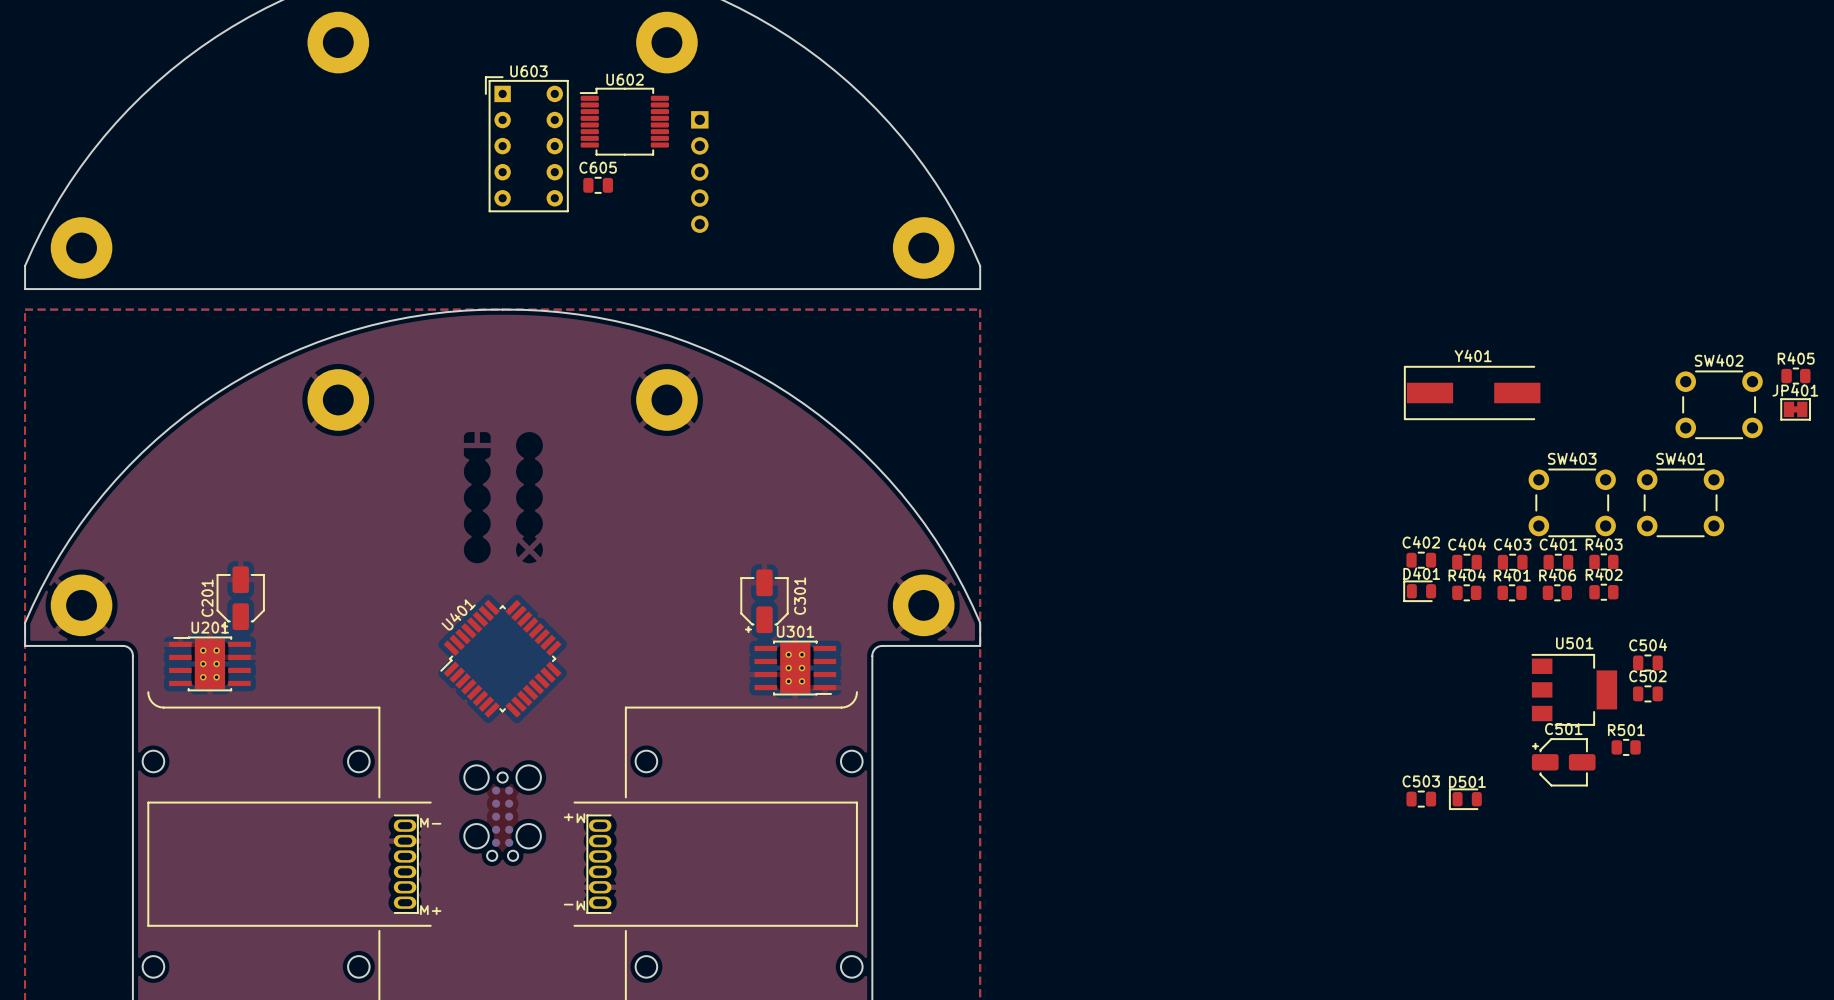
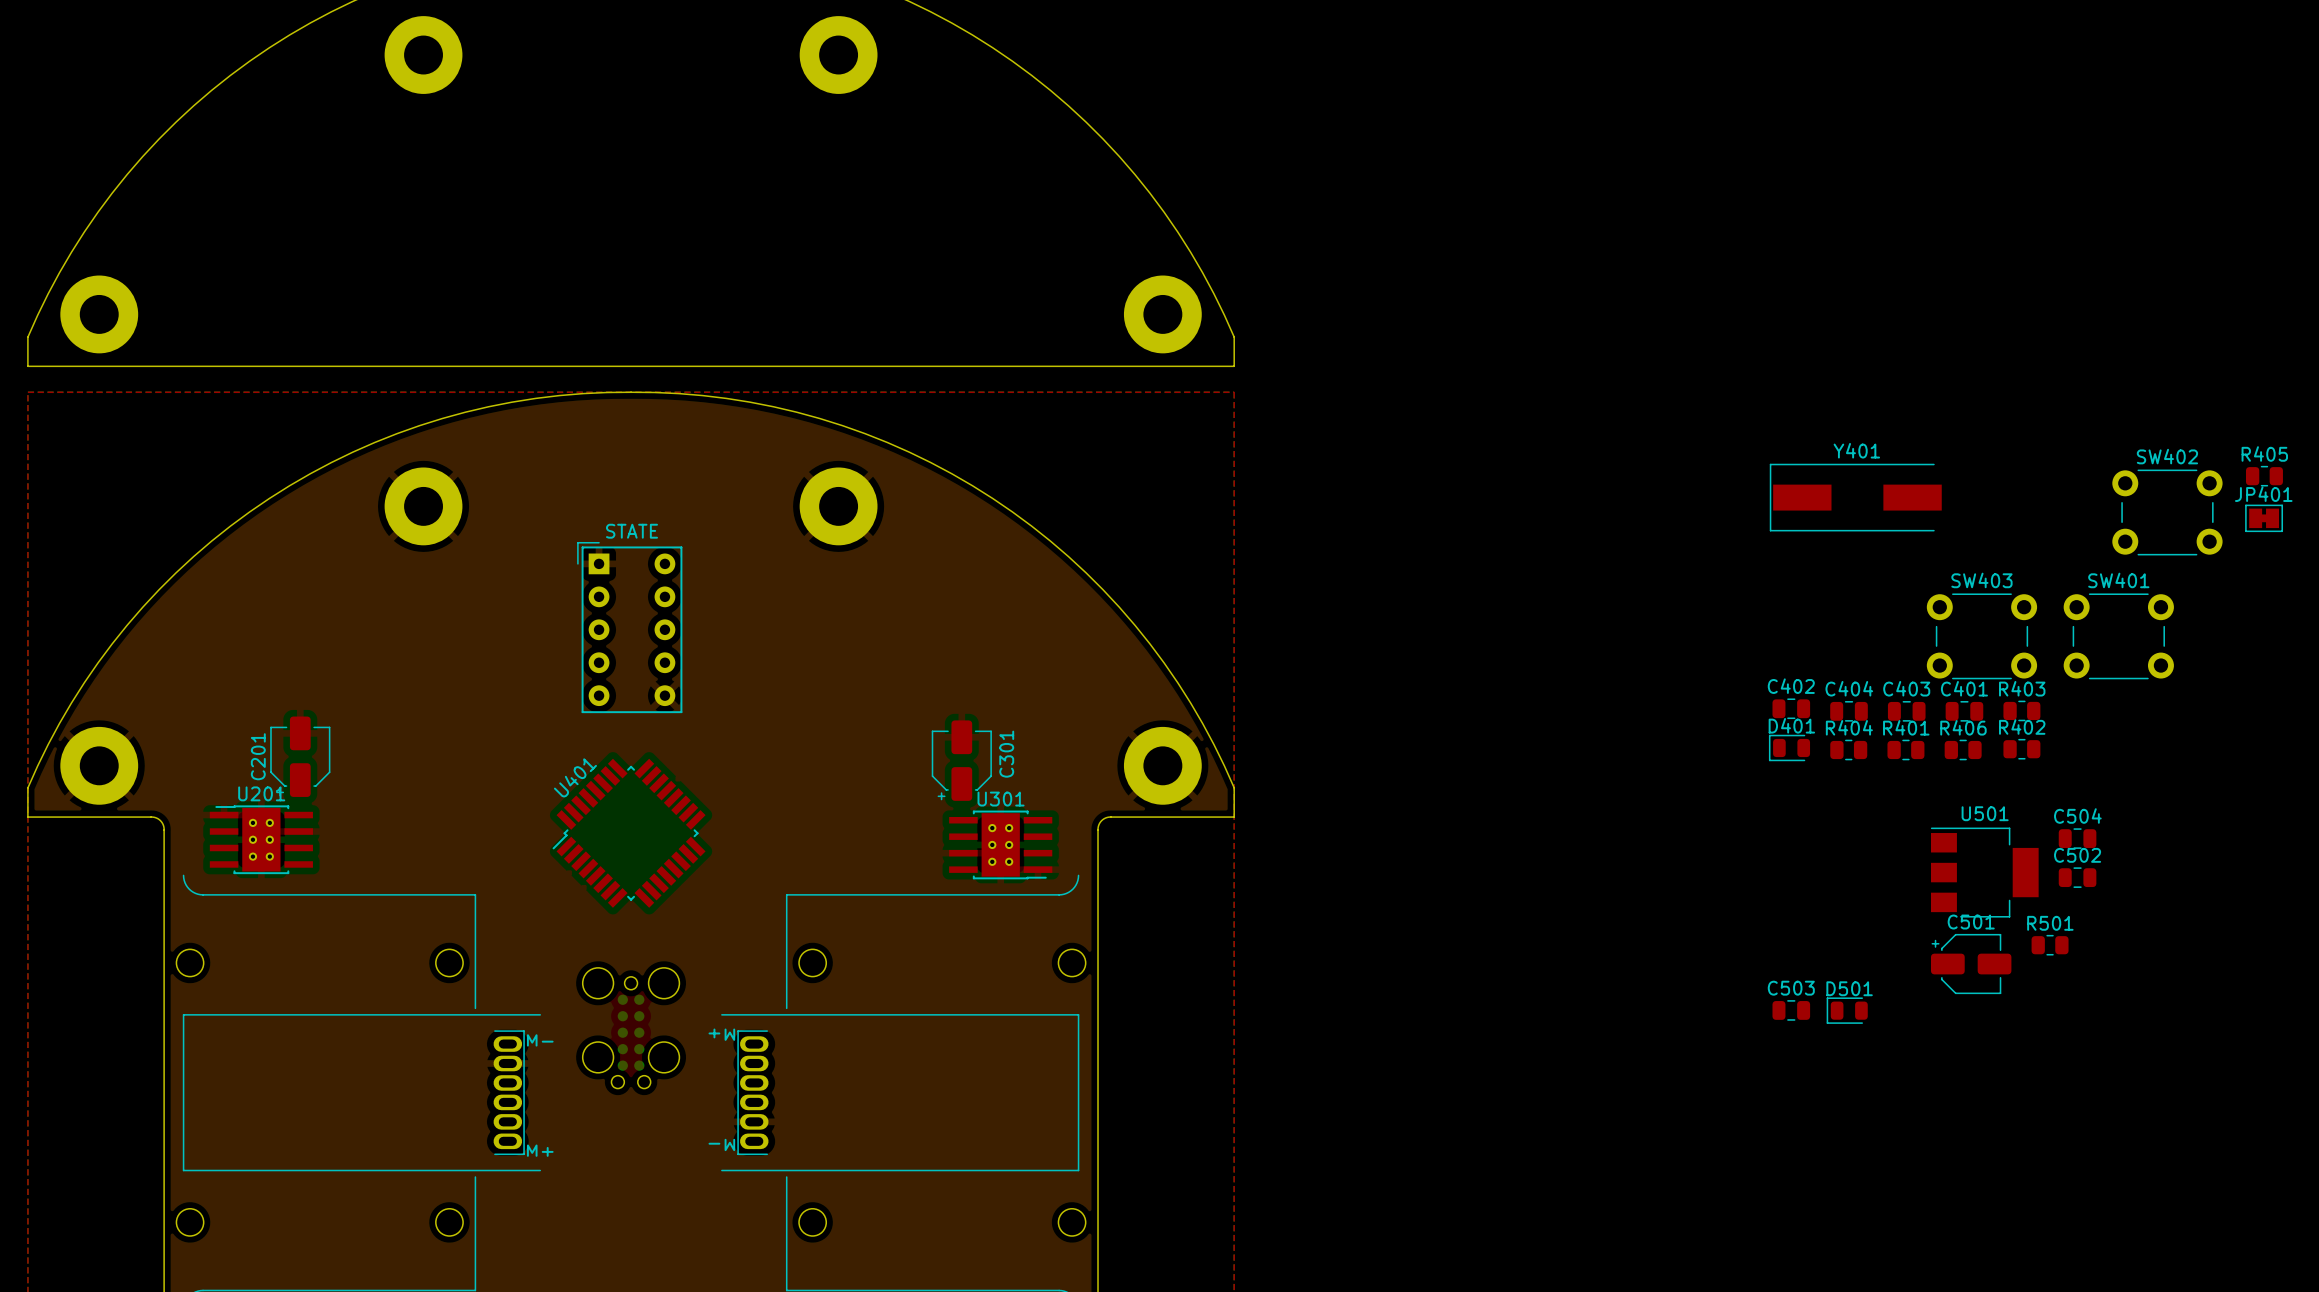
U602: (624, 121) -> none
U603: (526, 144) -> none
part: (699, 172) -> none
C605: (598, 185) -> none
part: none -> STATE (629, 627)

